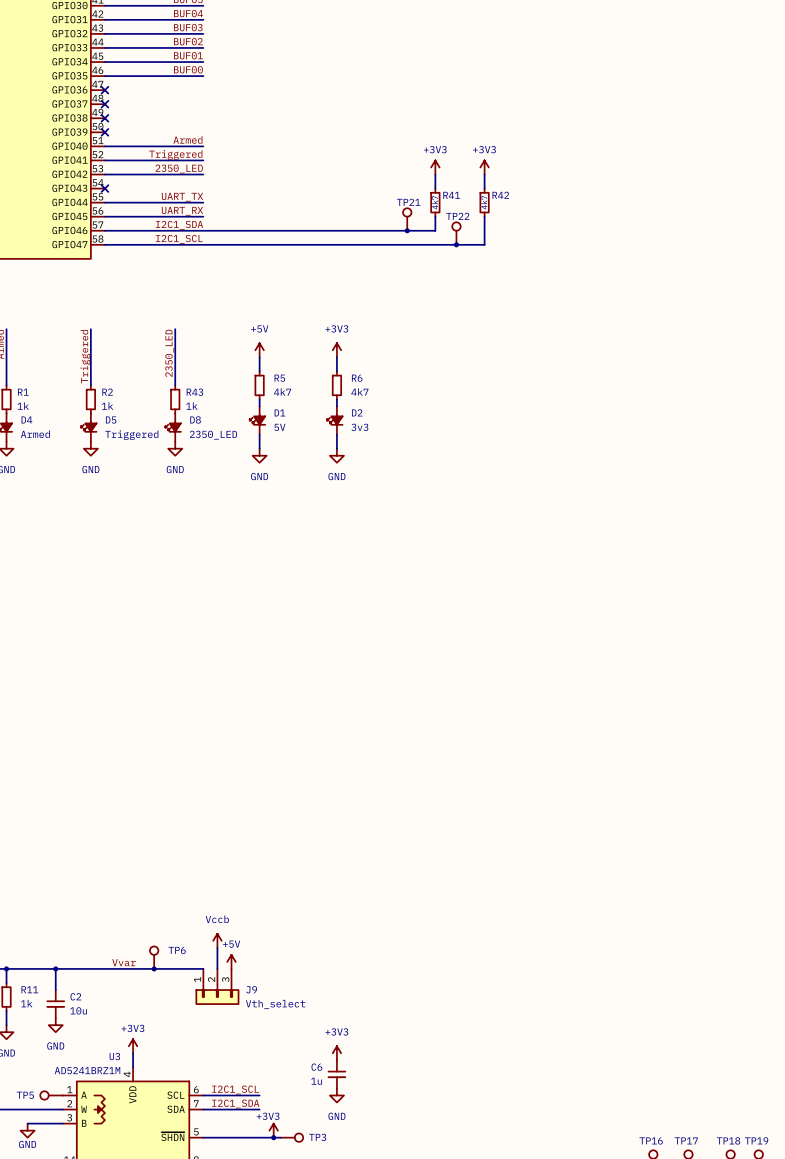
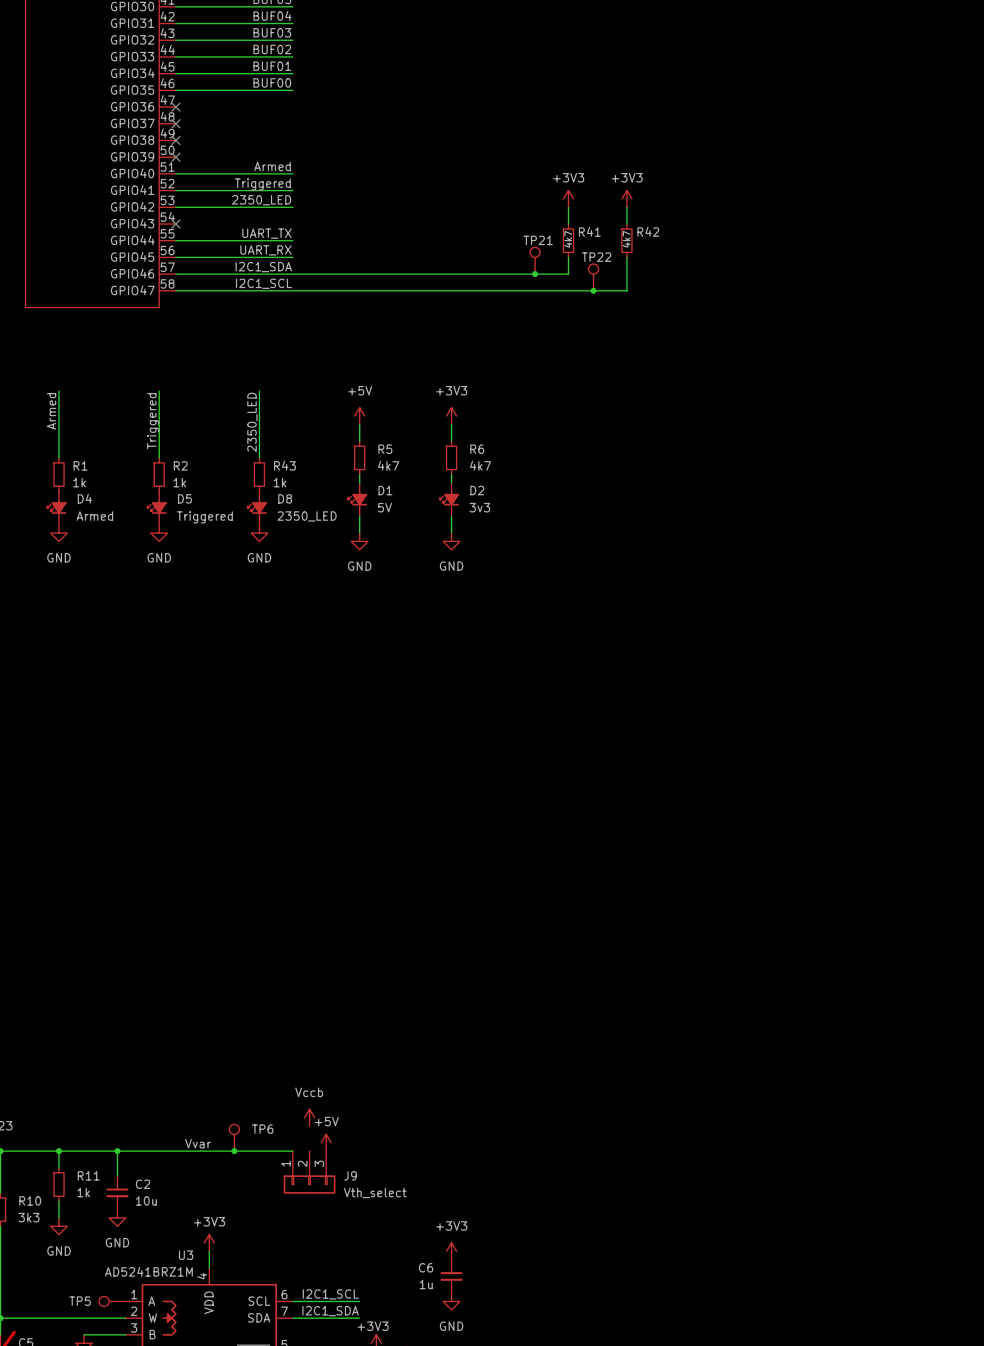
wire: (217, 947) (217, 968) -> none

